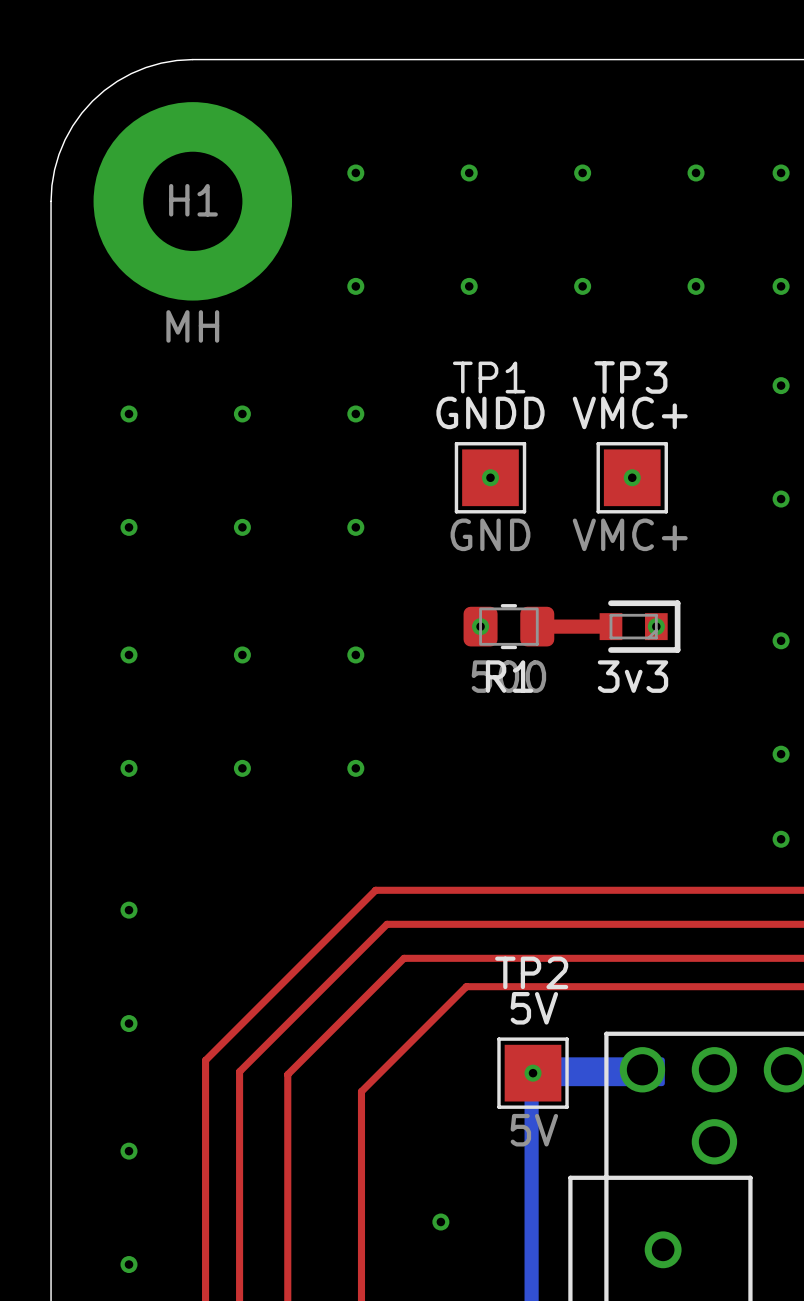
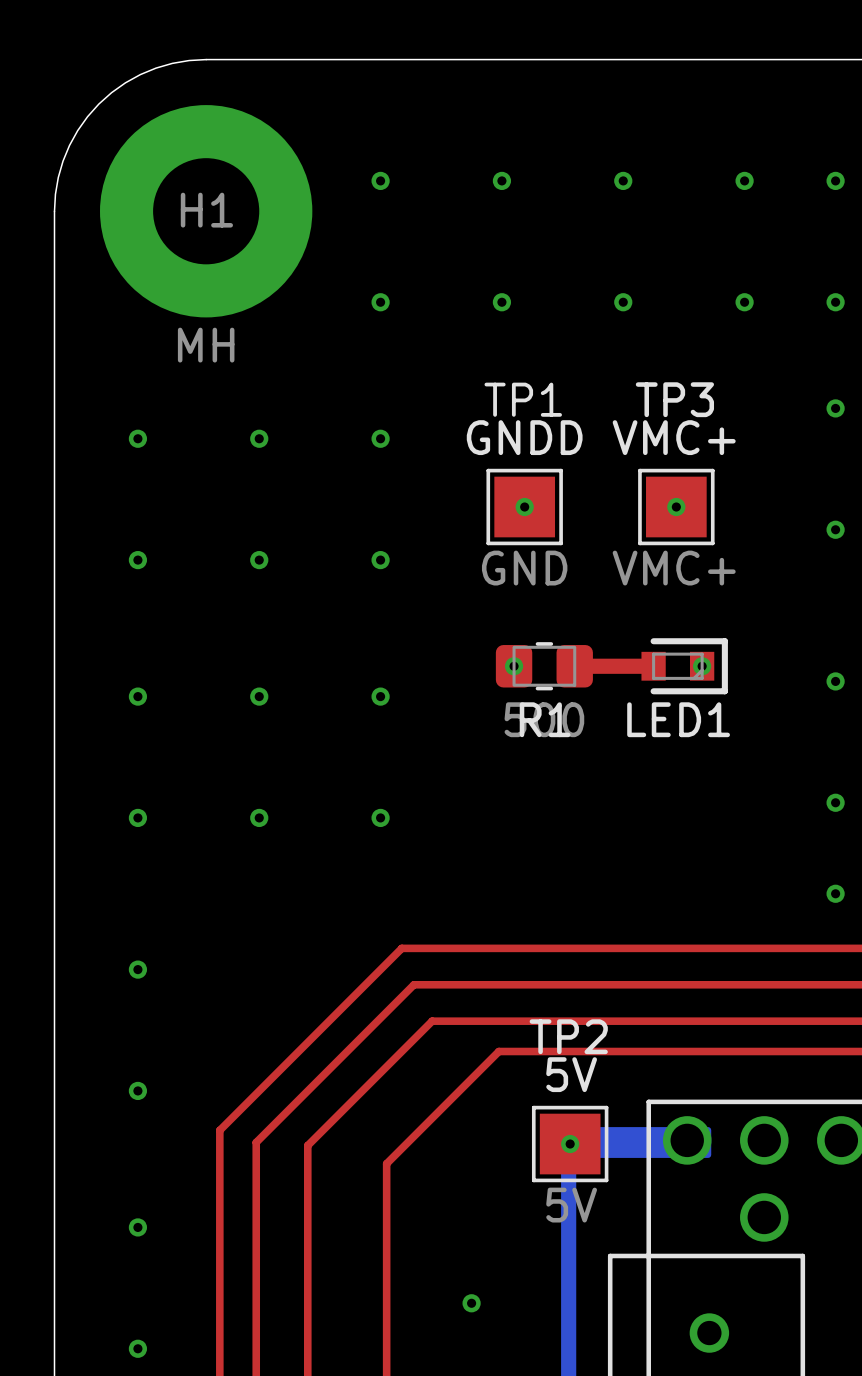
3v3 name: 3v3 (632, 676) -> LED1 (678, 719)

